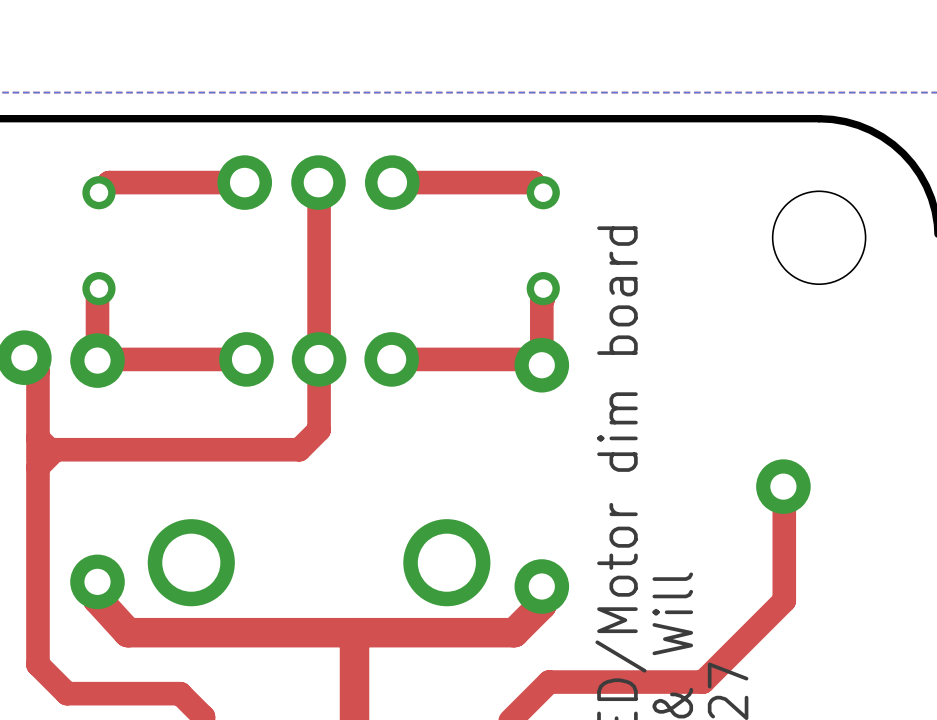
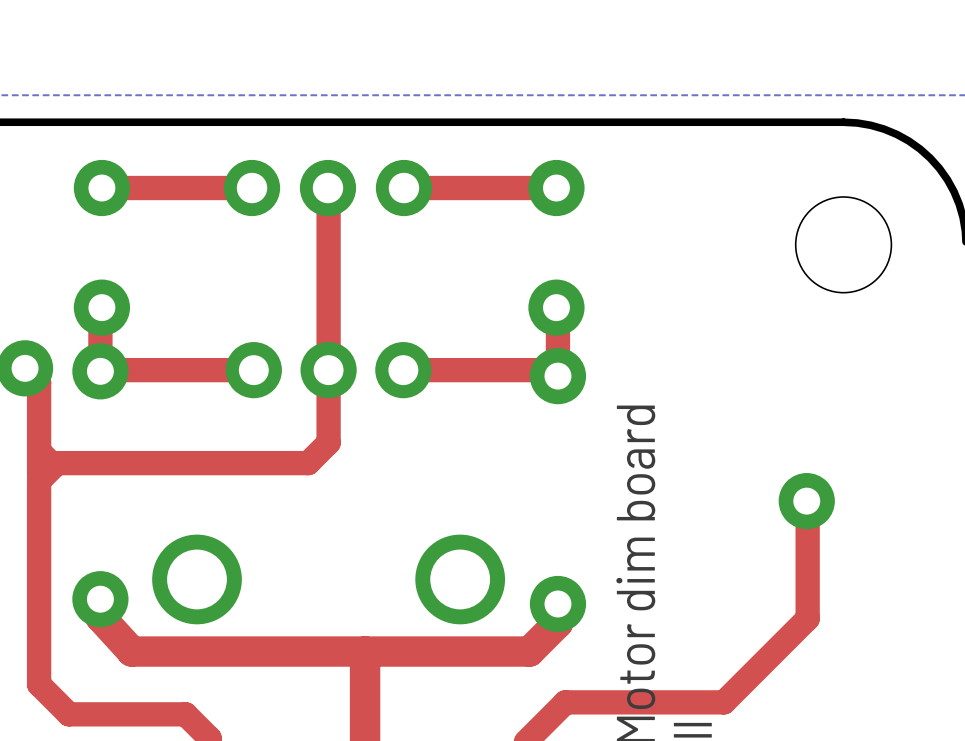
part footprint: [82, 176, 116, 306] -> [73, 159, 131, 336]
part footprint: [526, 176, 560, 306] -> [528, 159, 585, 336]

